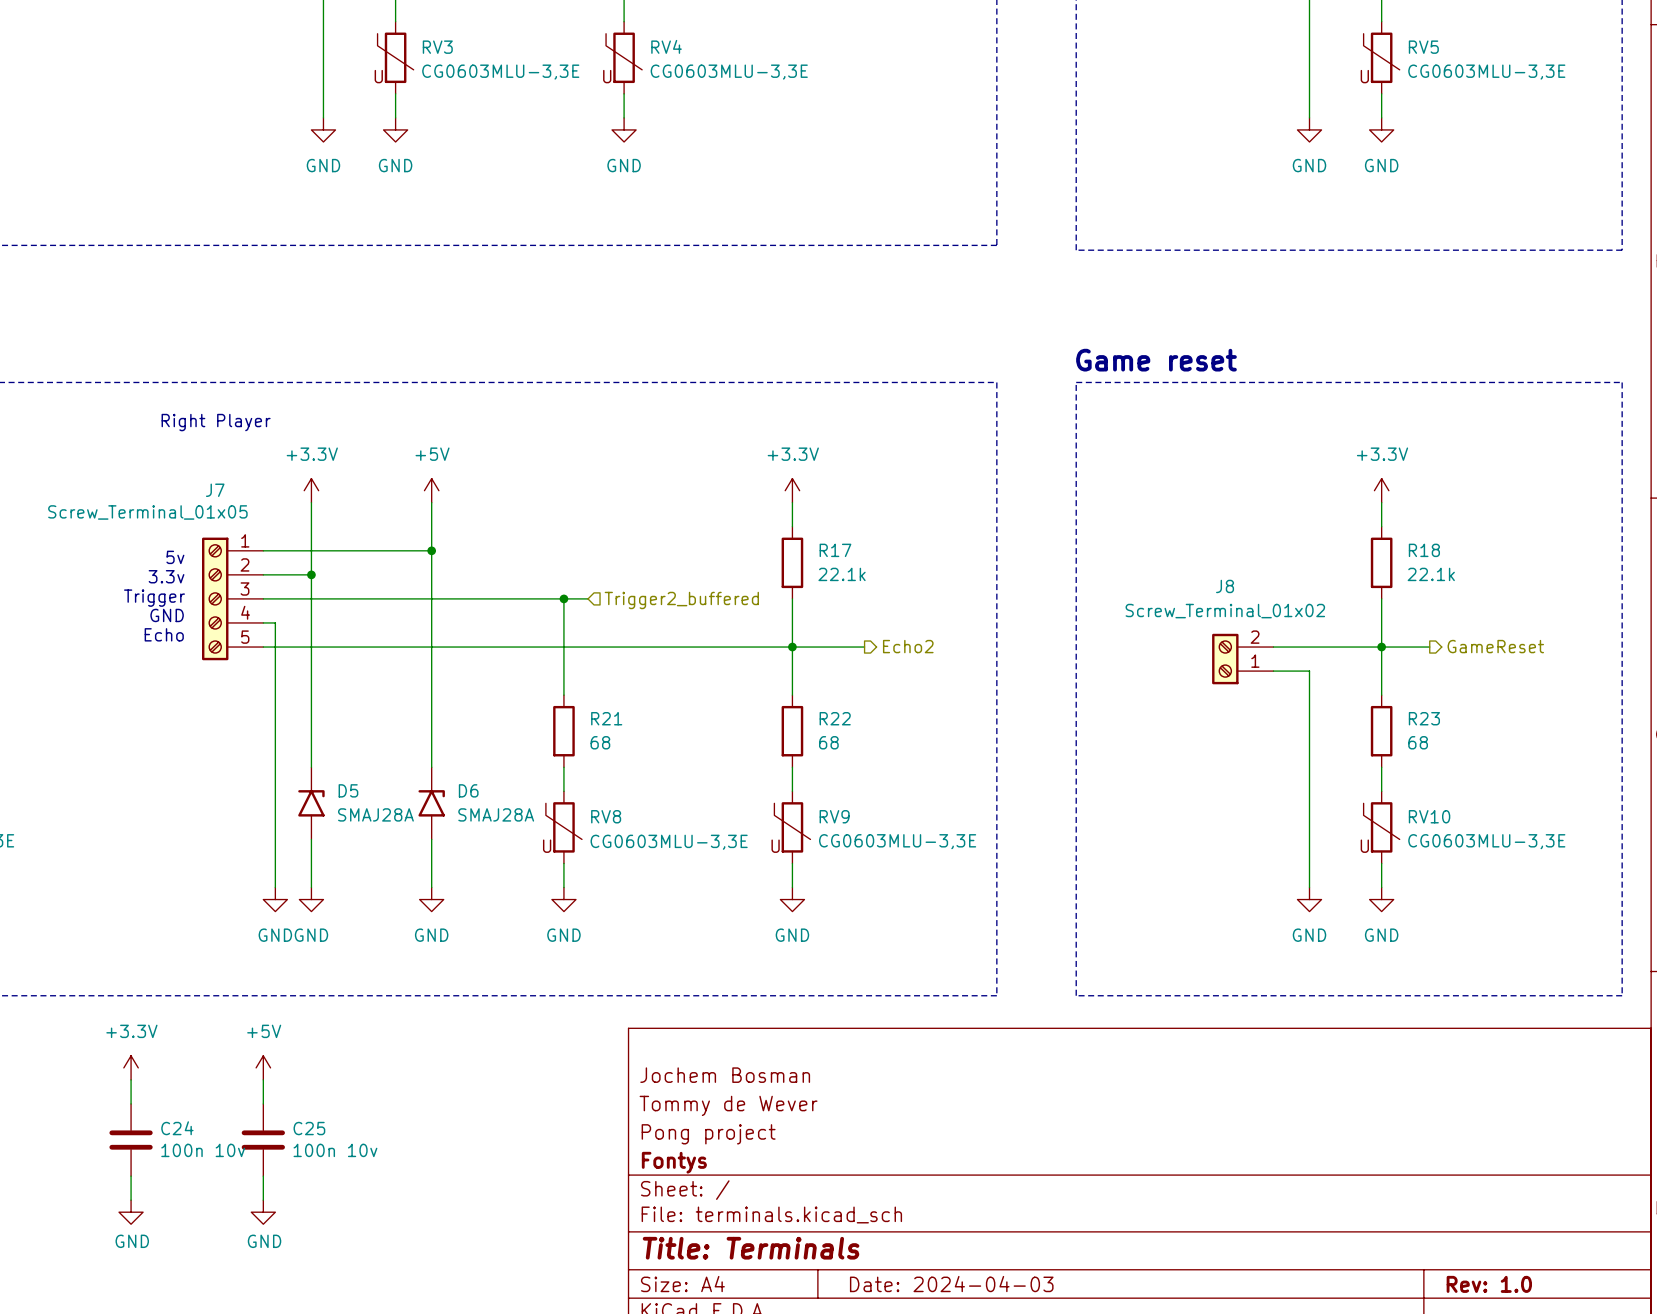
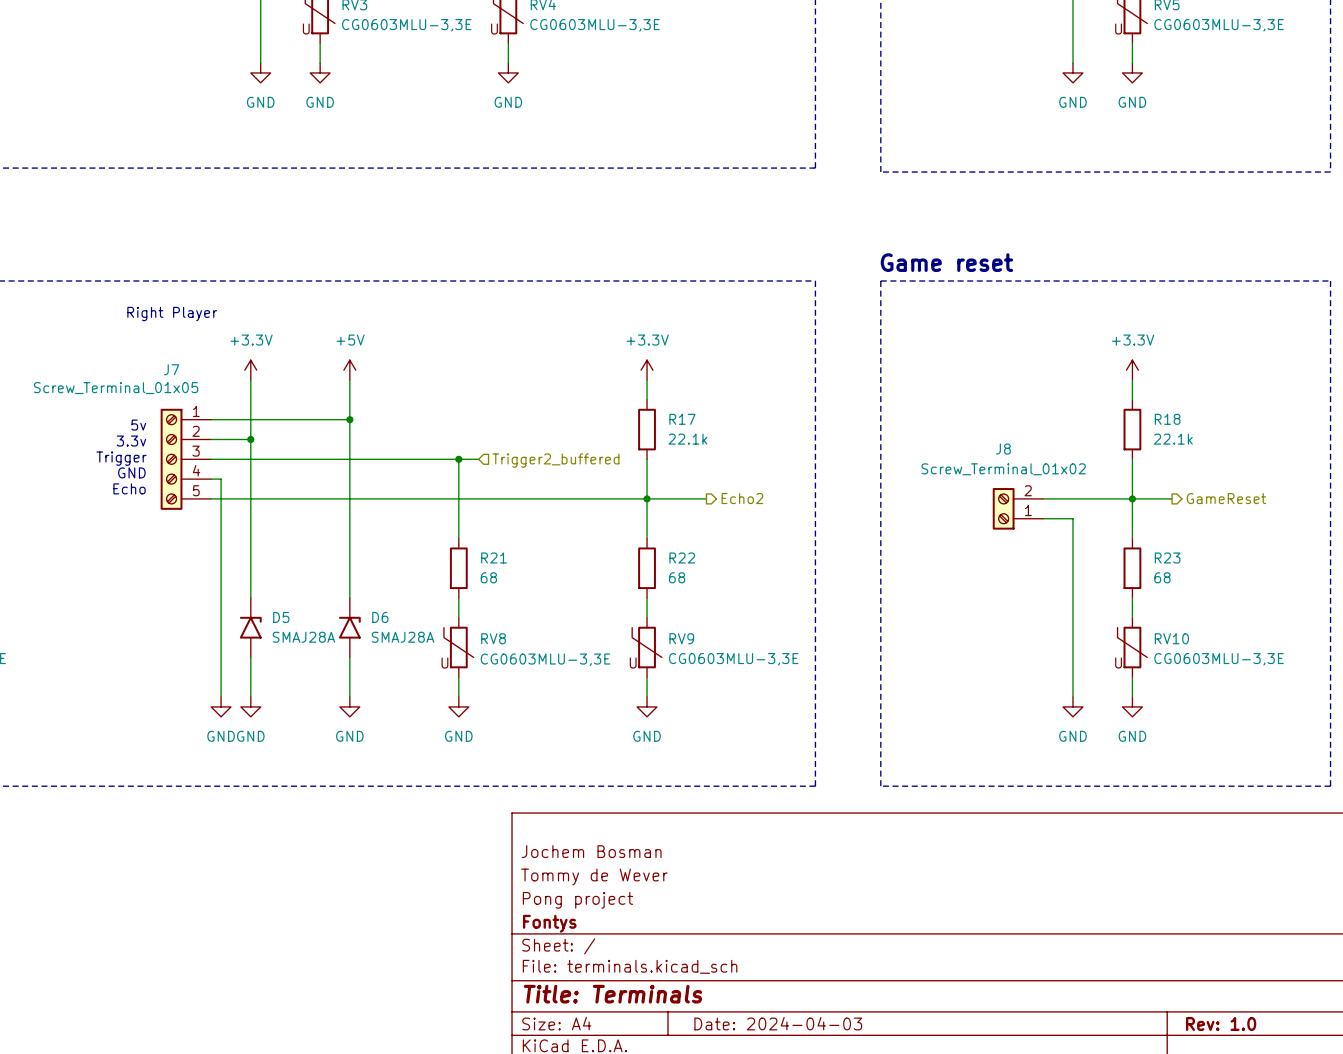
power symbol: +3.3V (131, 1067) -> none
power symbol: +5V (263, 1067) -> none
wire: (131, 1079) (131, 1103) -> none
wire: (263, 1079) (263, 1103) -> none
C24: 100n 10v (131, 1140) -> none
C25: 100n 10v (263, 1140) -> none
wire: (131, 1176) (131, 1200) -> none
wire: (263, 1176) (263, 1200) -> none
power symbol: GND (131, 1212) -> none
power symbol: GND (263, 1212) -> none

